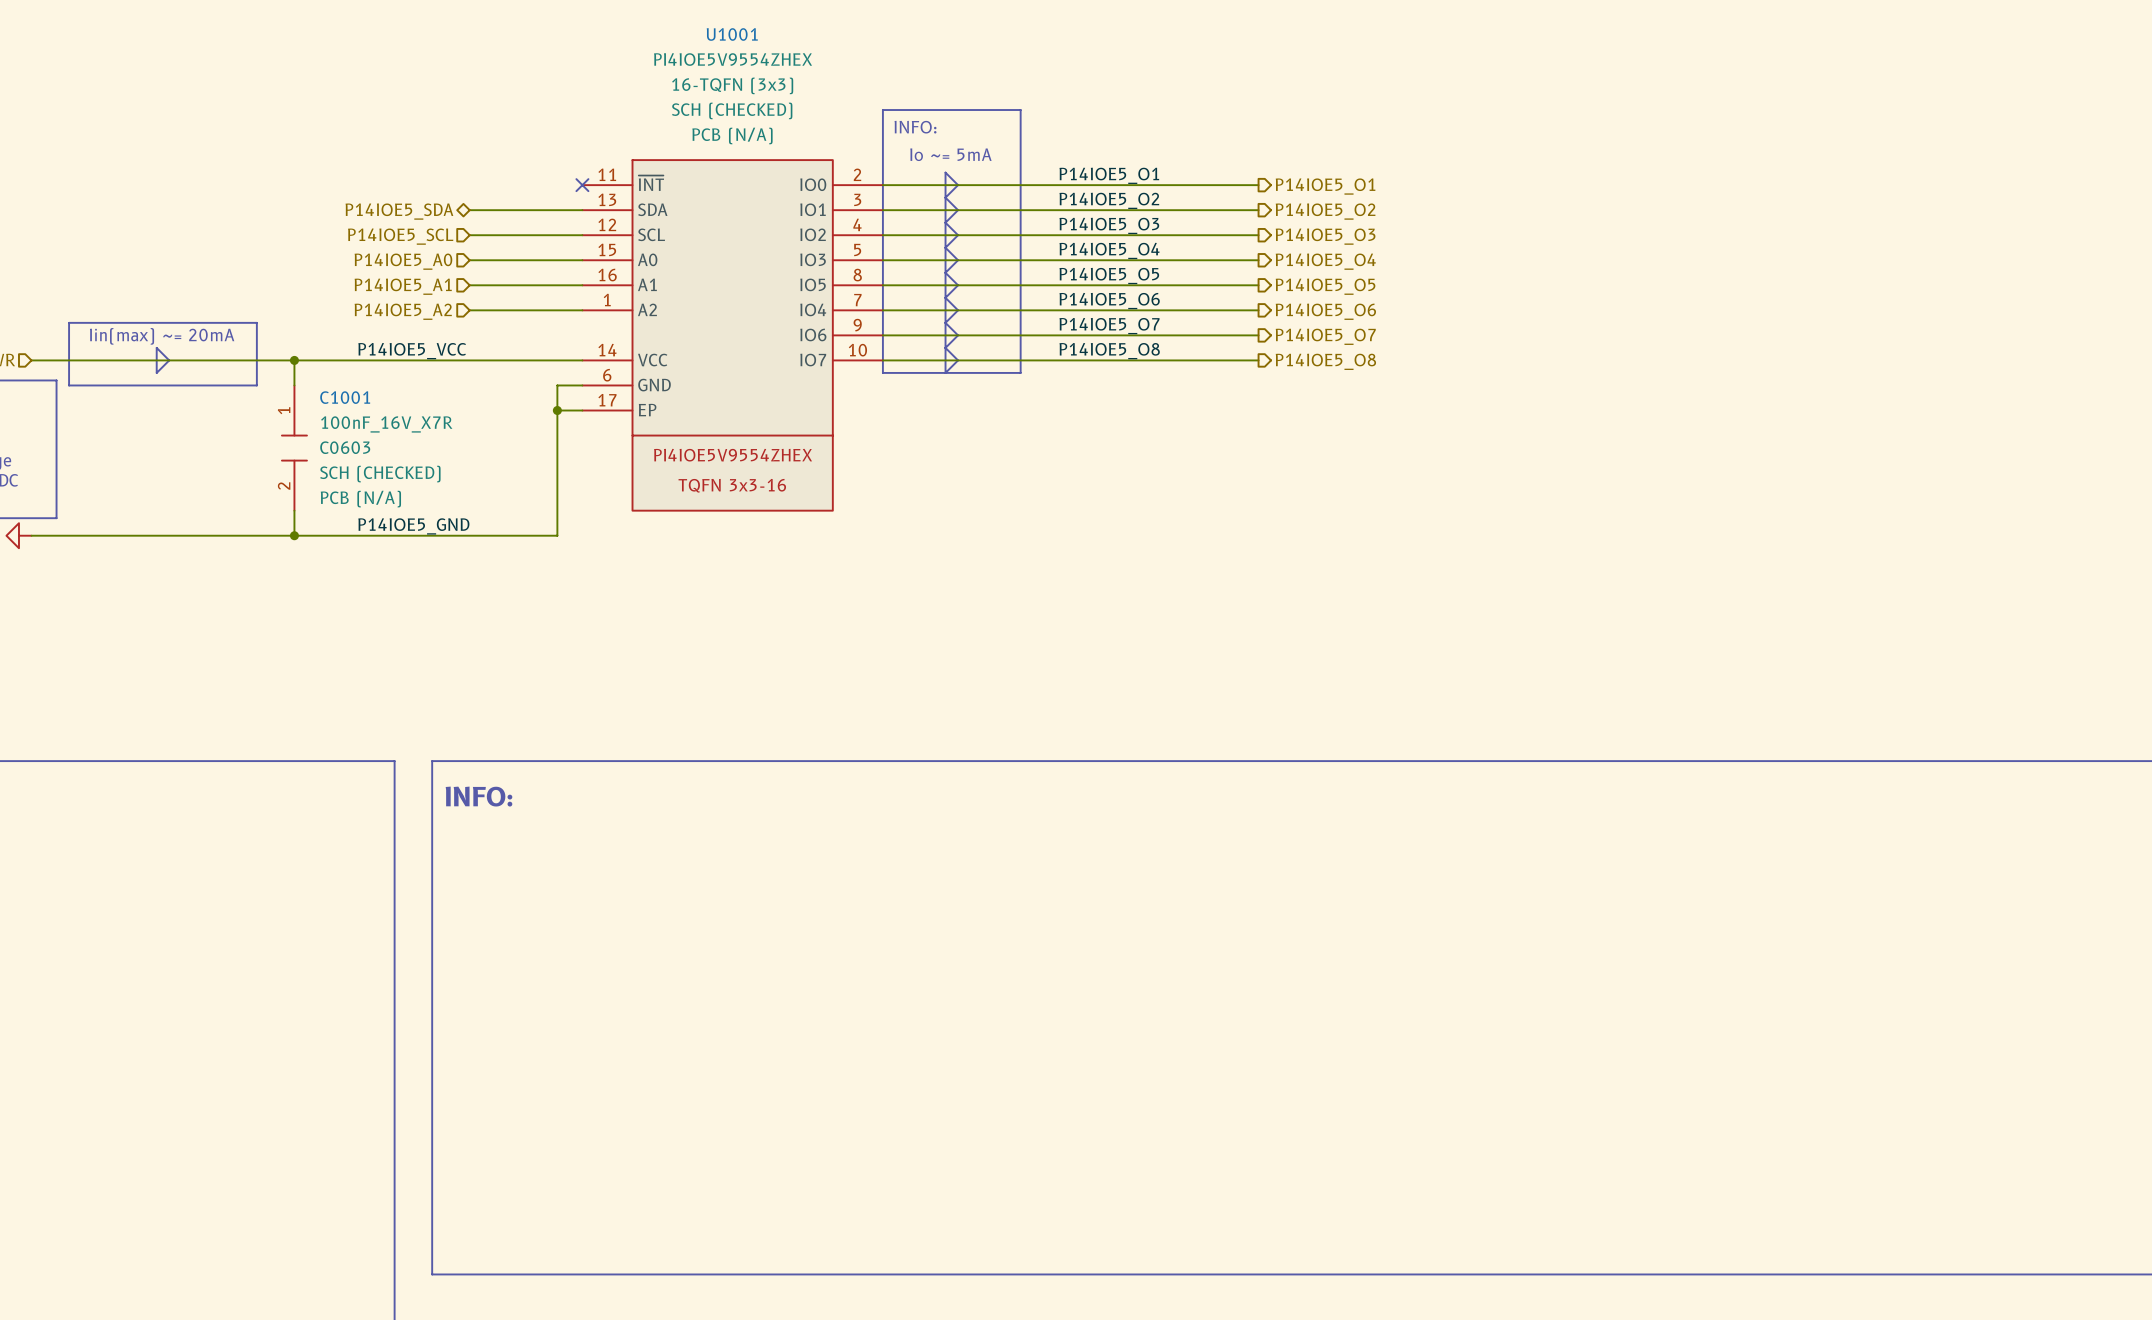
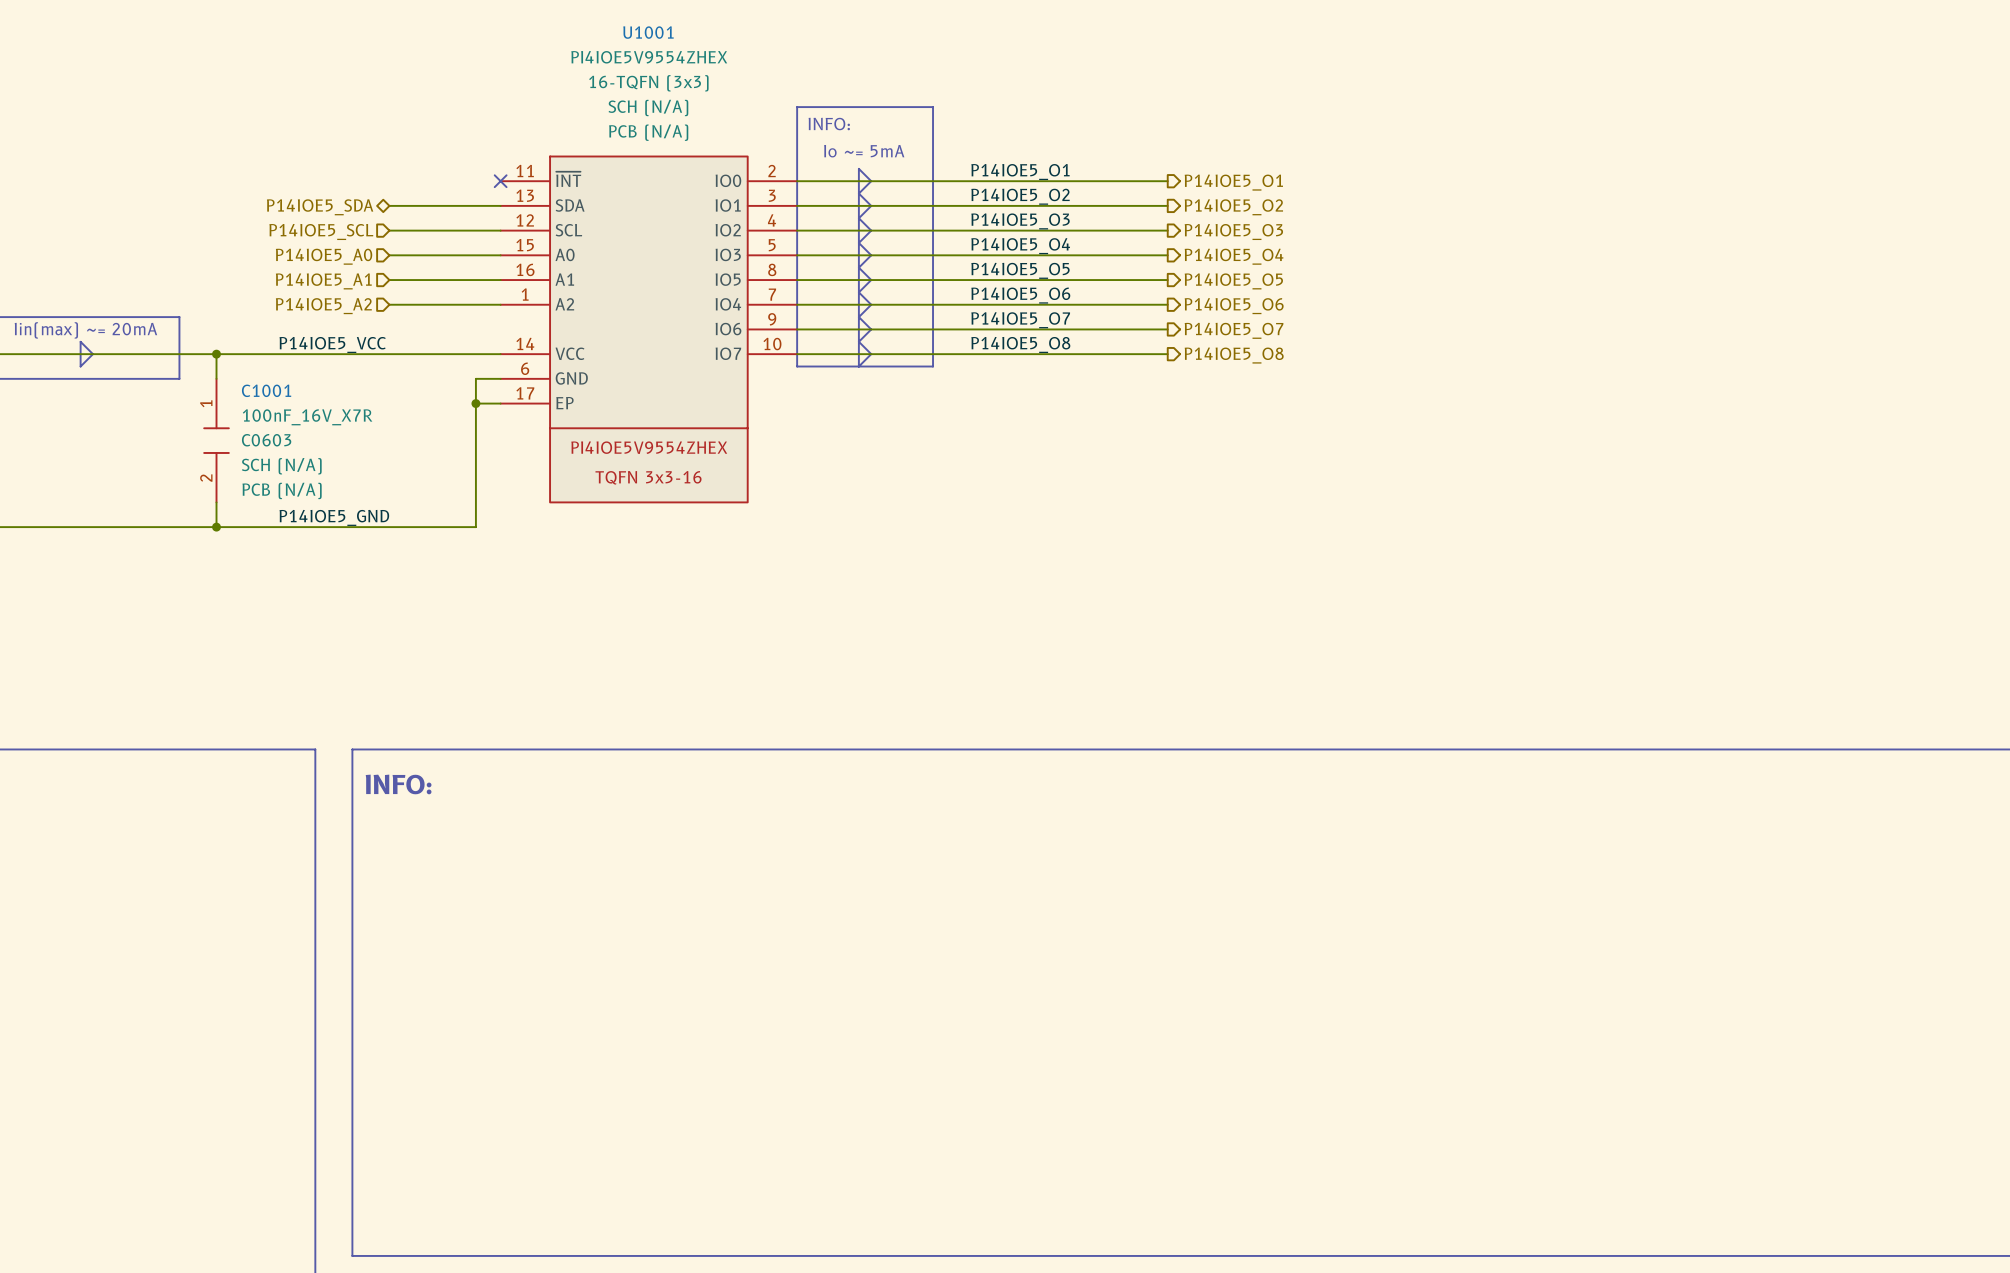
U1001 text: SCH (CHECKED) (732, 110) -> SCH (N/A) (648, 108)
C1001 text: SCH (CHECKED) (380, 474) -> SCH (N/A) (281, 466)

